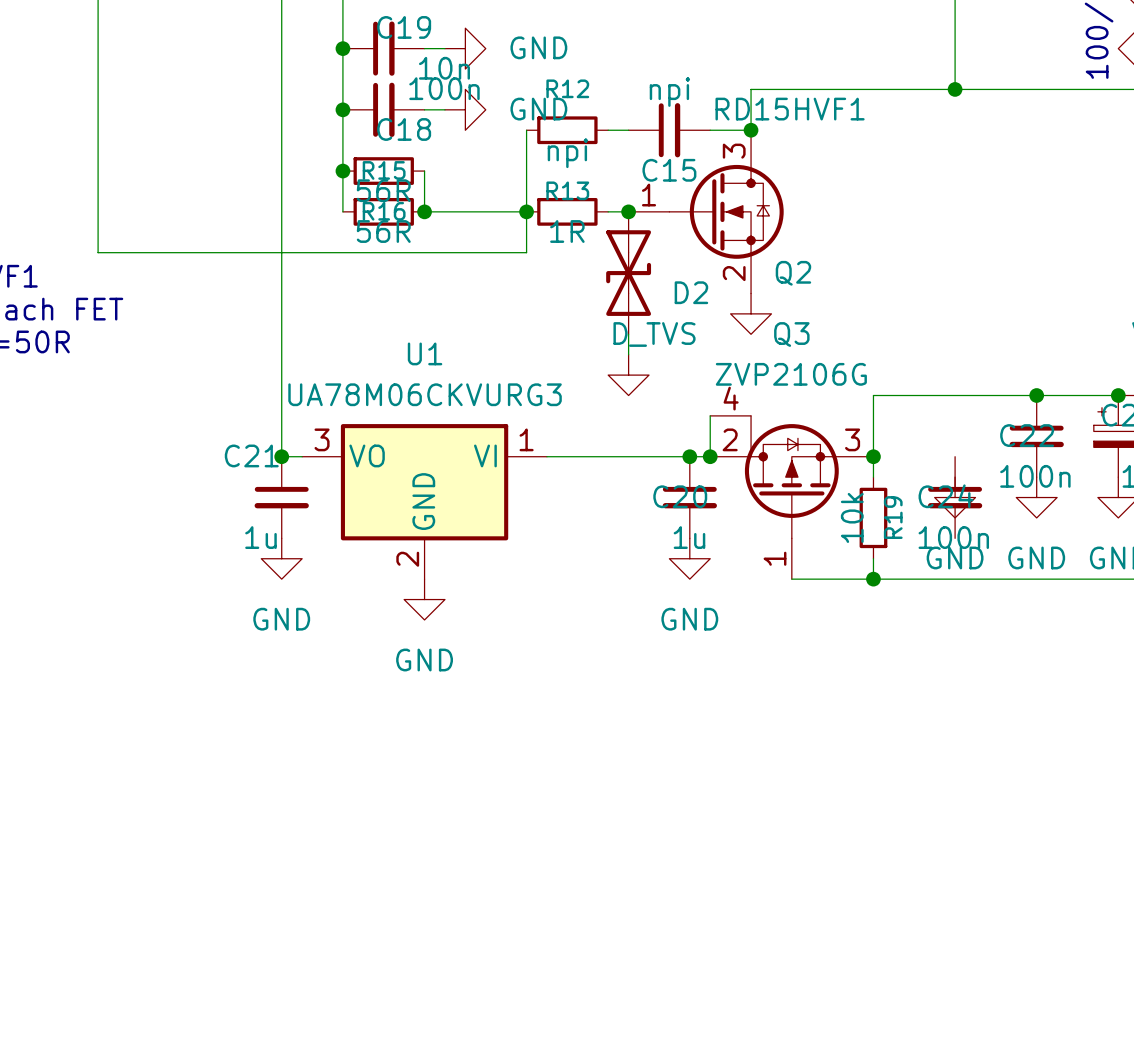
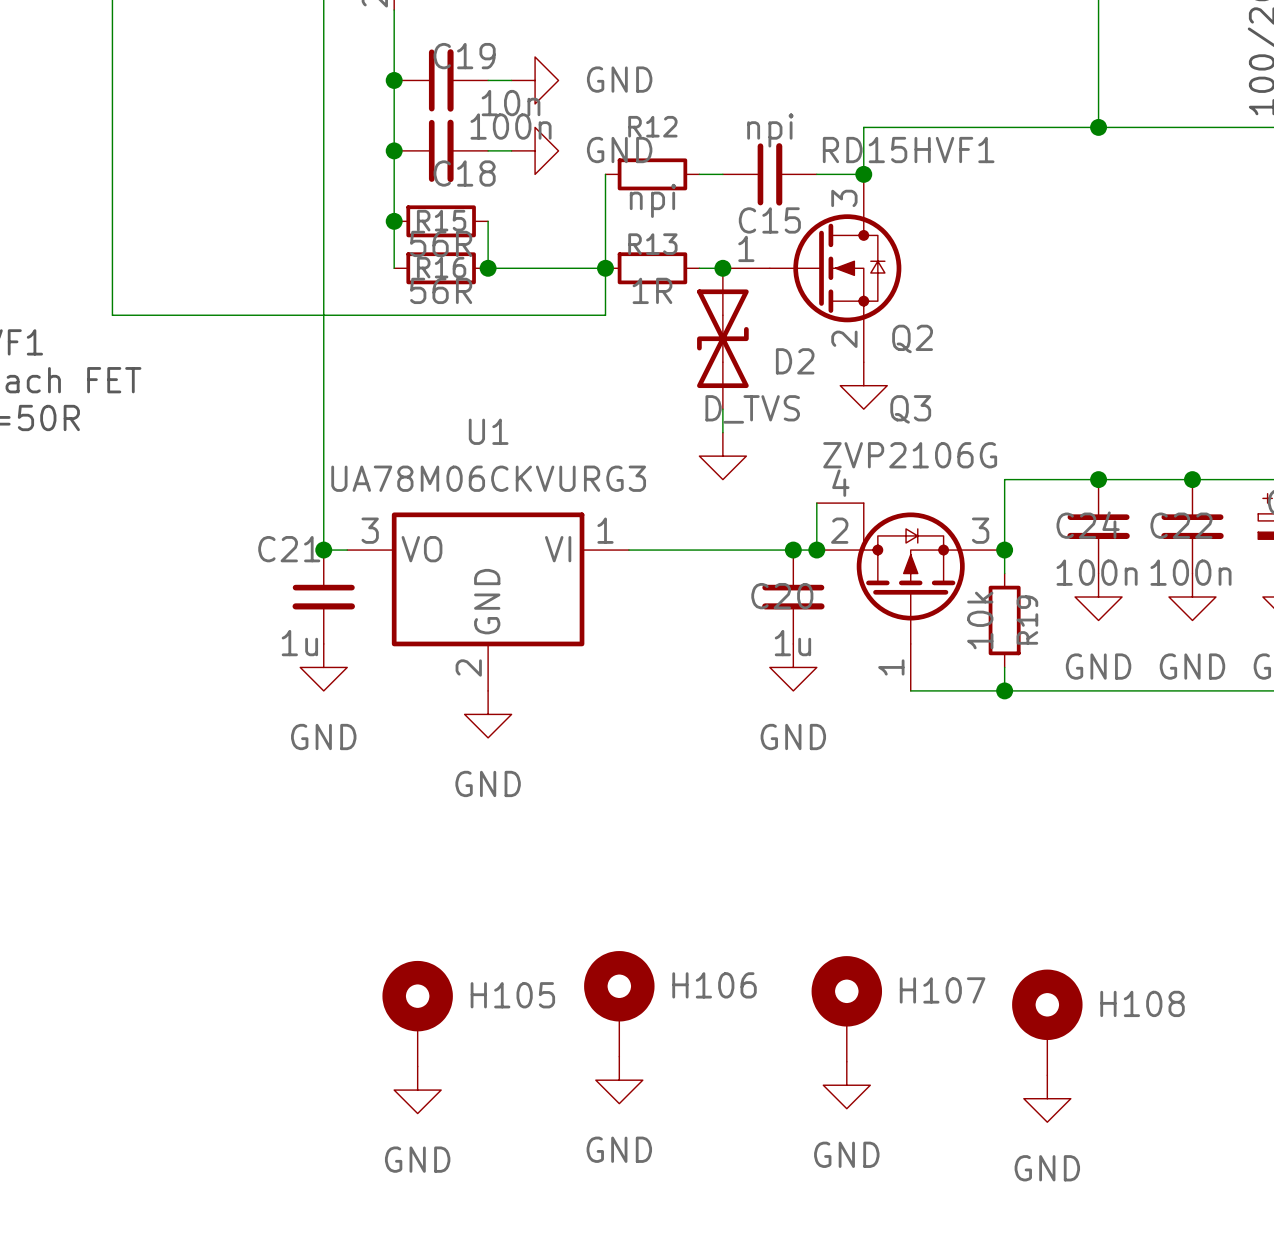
junction: none -> (1098, 479)
C24 position: (955, 497) -> (1098, 526)
H106: none -> (619, 1003)
H107: none -> (846, 1008)
H105: none -> (417, 1013)
H108: none -> (1047, 1022)
power symbol: none -> GND (619, 1080)
power symbol: none -> GND (846, 1085)
power symbol: none -> GND (417, 1090)
power symbol: none -> GND (1047, 1098)

